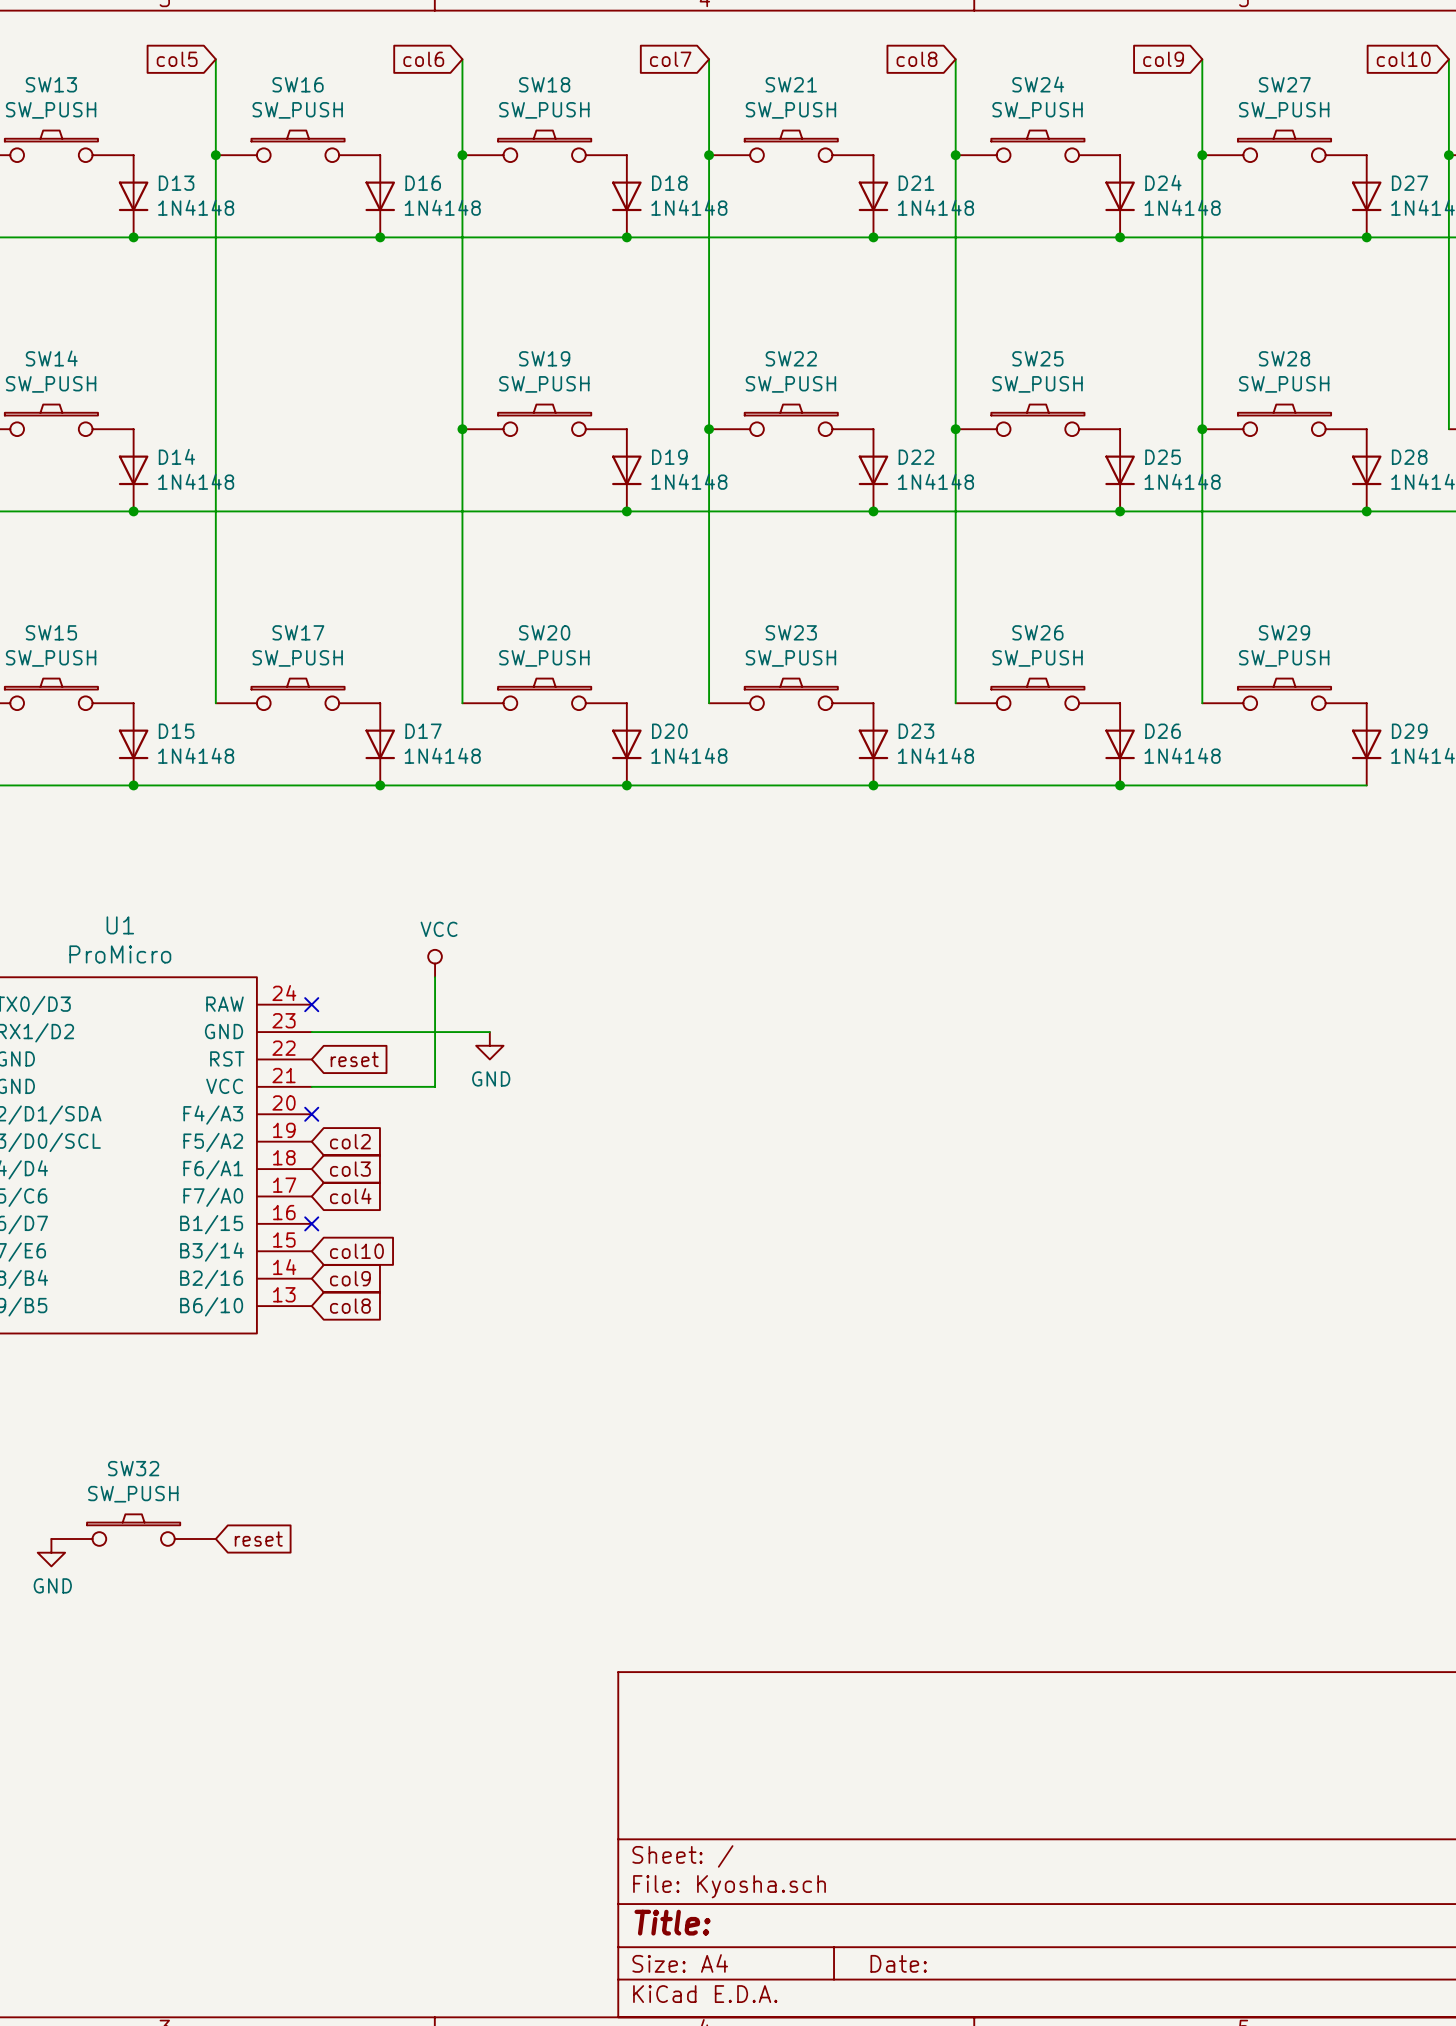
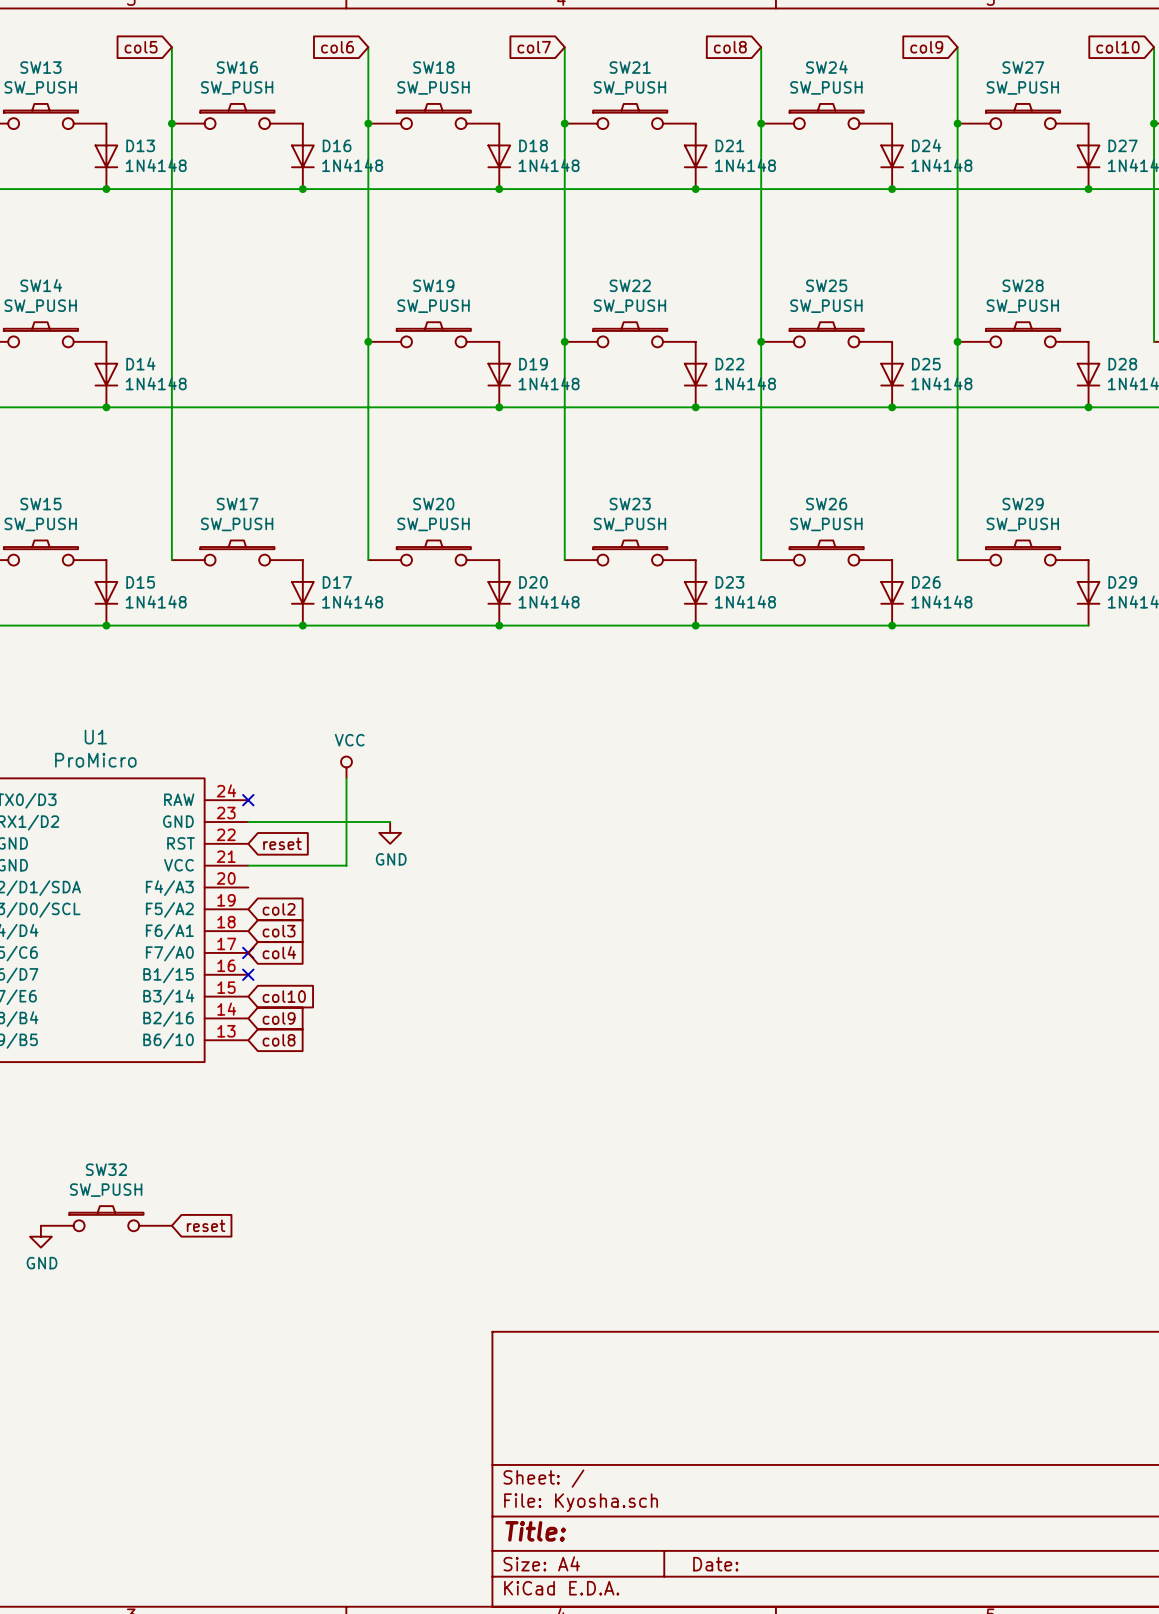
no-connect mark: (311, 1114) -> none
no-connect mark: none -> (248, 952)

